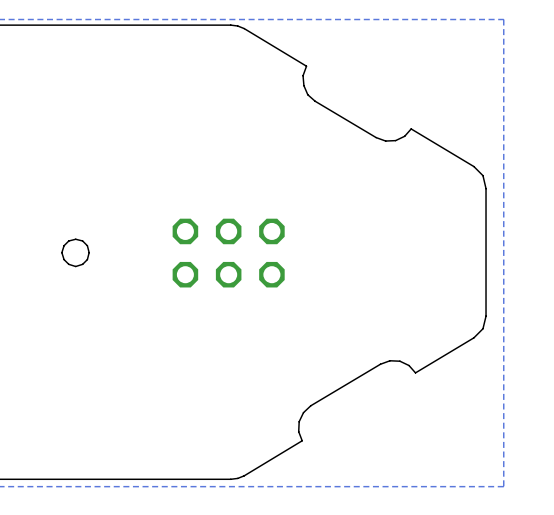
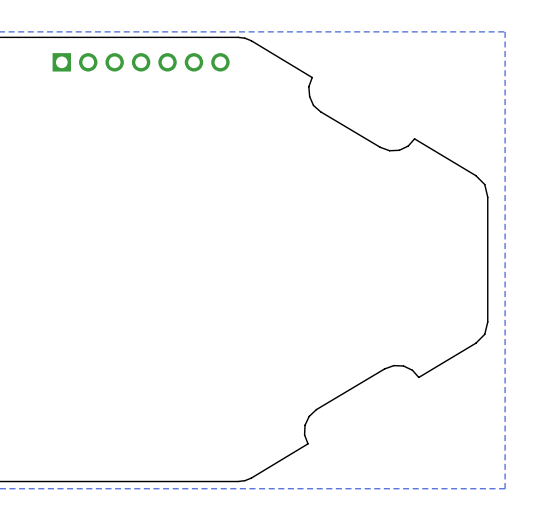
part: none -> (141, 62)
board edge: (75, 239) (68, 240) (64, 245) (61, 252) (64, 259) (68, 264) (75, 266) (82, 264) (87, 259) (89, 252) (87, 245) (82, 240) (75, 239) -> none
part: (228, 253) -> none

